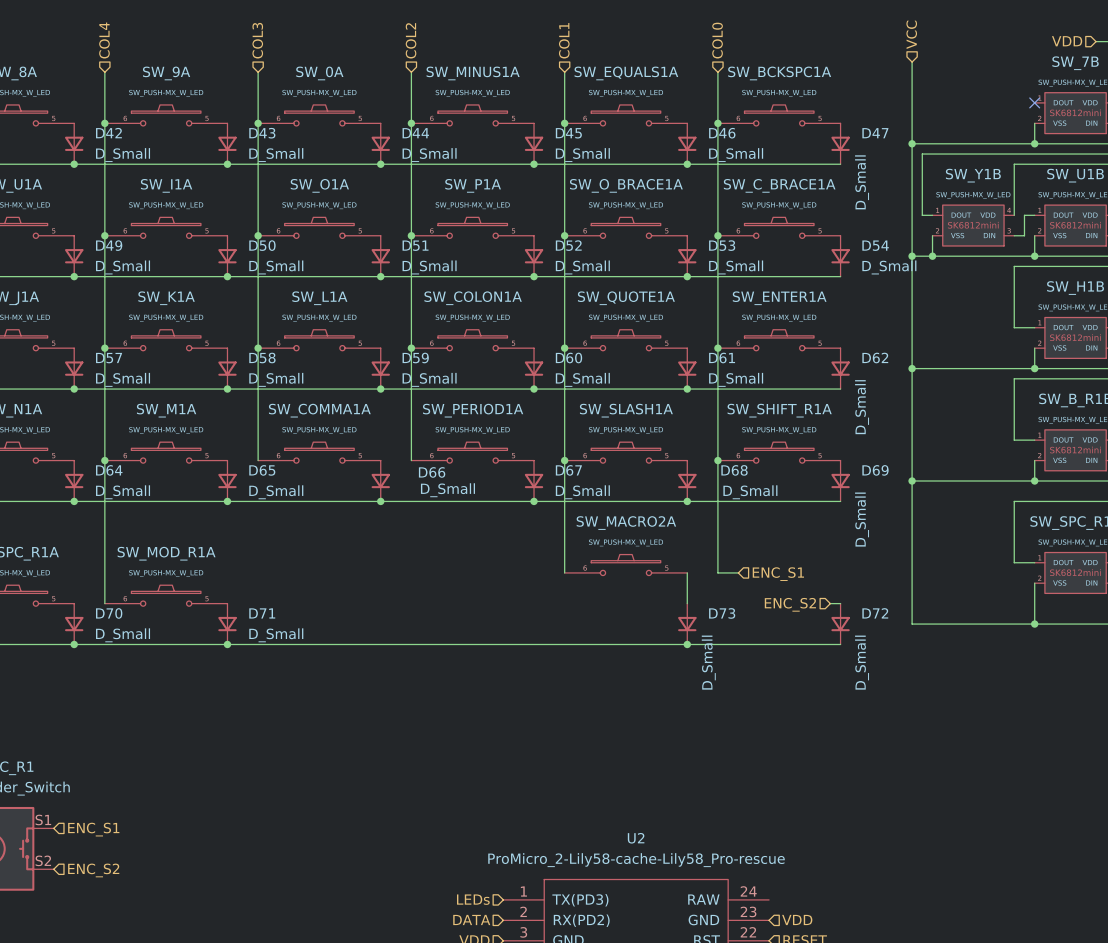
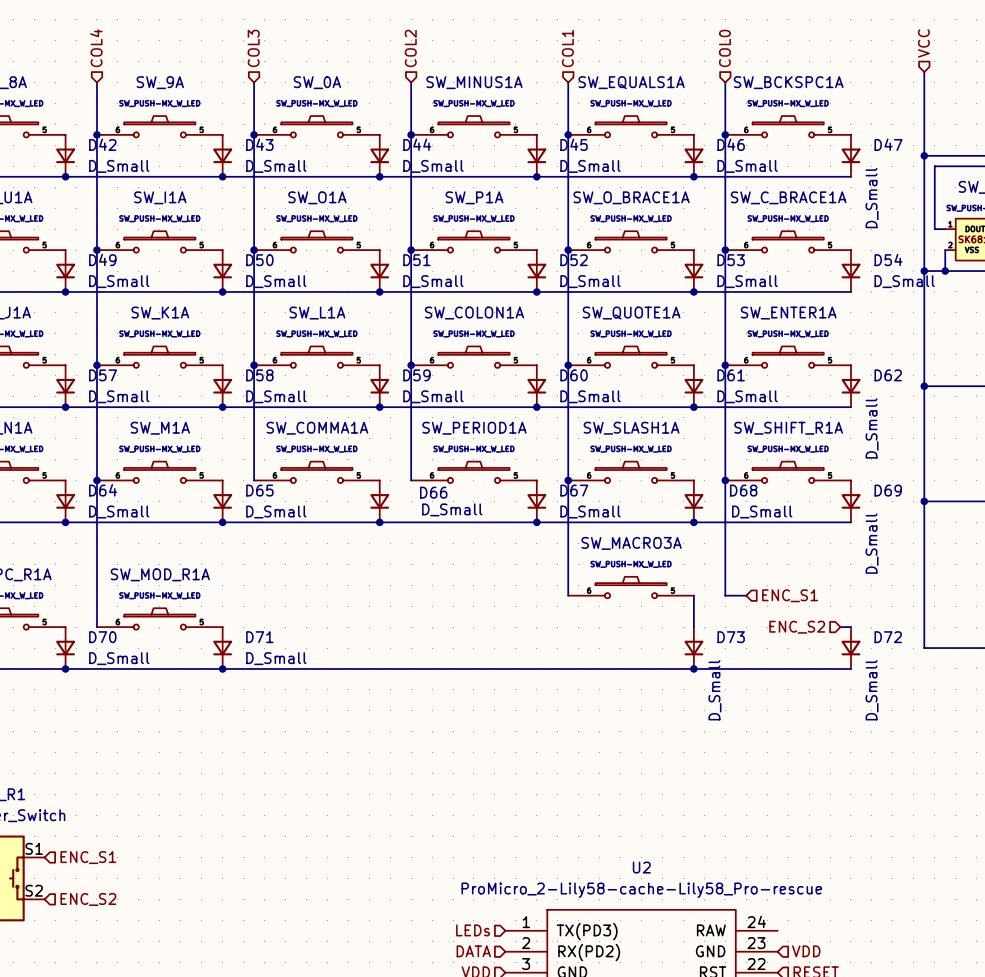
SW_MACRO2A name: SW_MACRO2A (626, 523) -> SW_MACRO3A (631, 543)

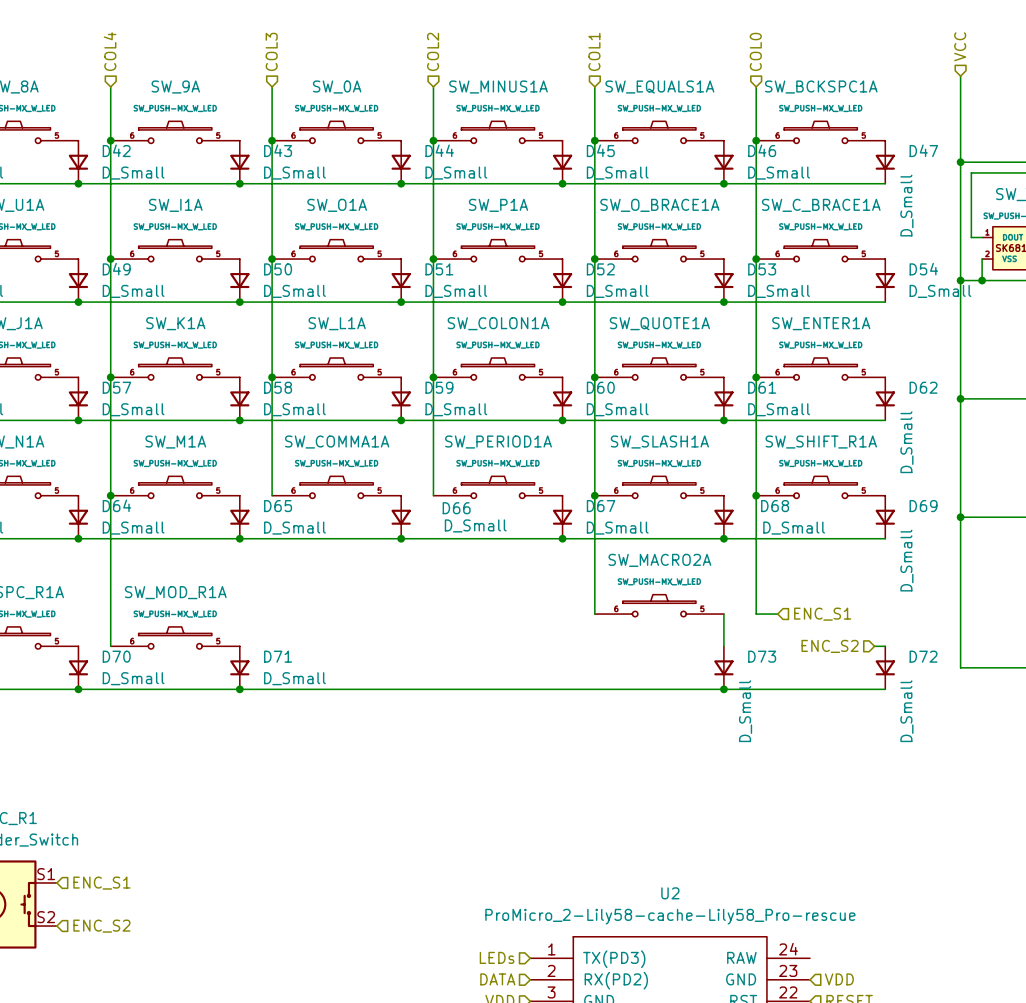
SW_MACRO3A name: SW_MACRO3A (631, 543) -> SW_MACRO2A (659, 560)

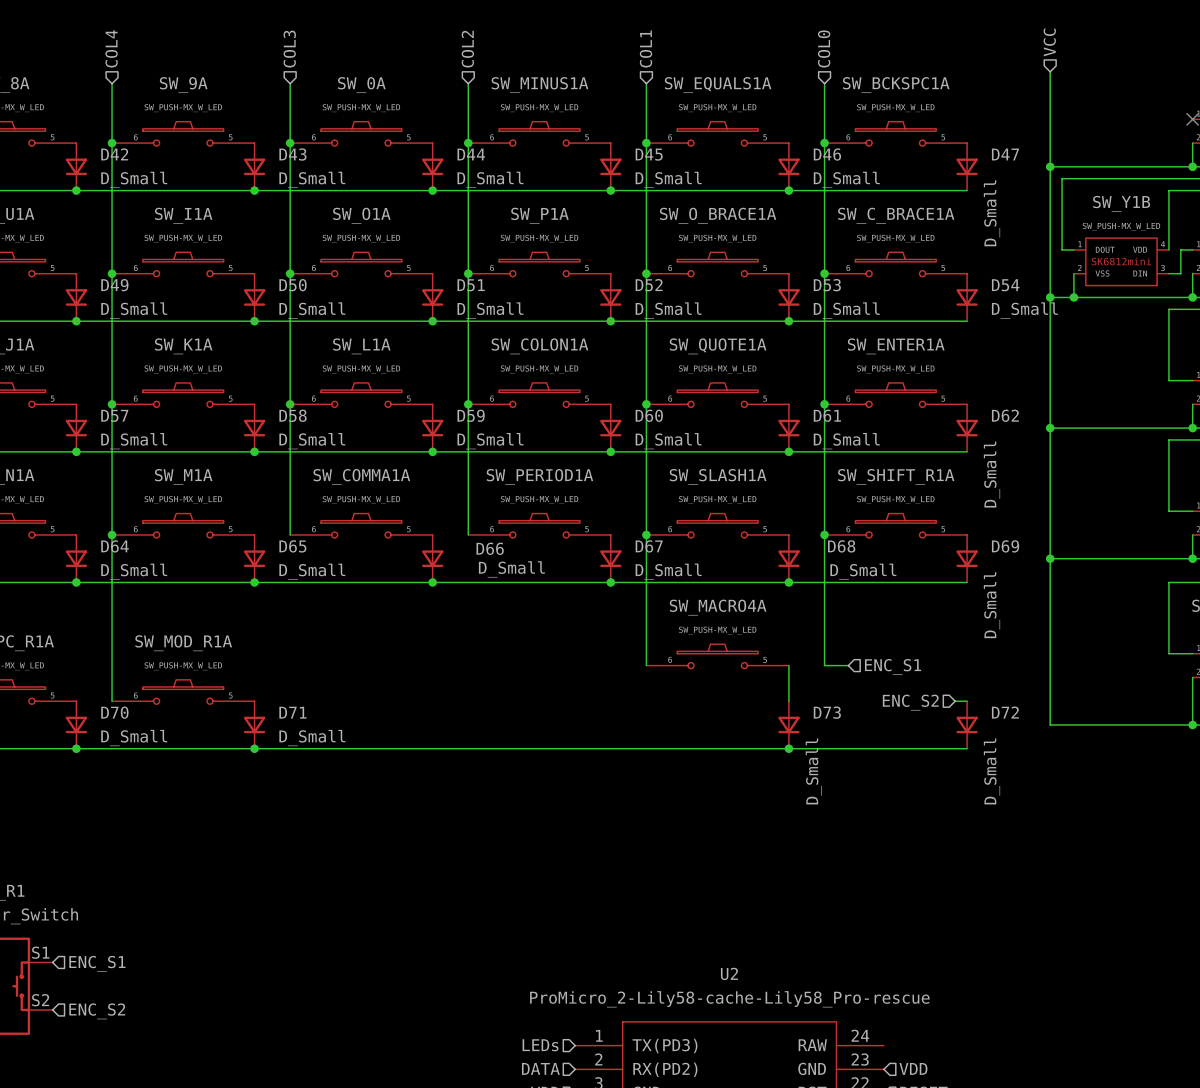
SW_MACRO2A name: SW_MACRO2A (659, 560) -> SW_MACRO4A (718, 607)

